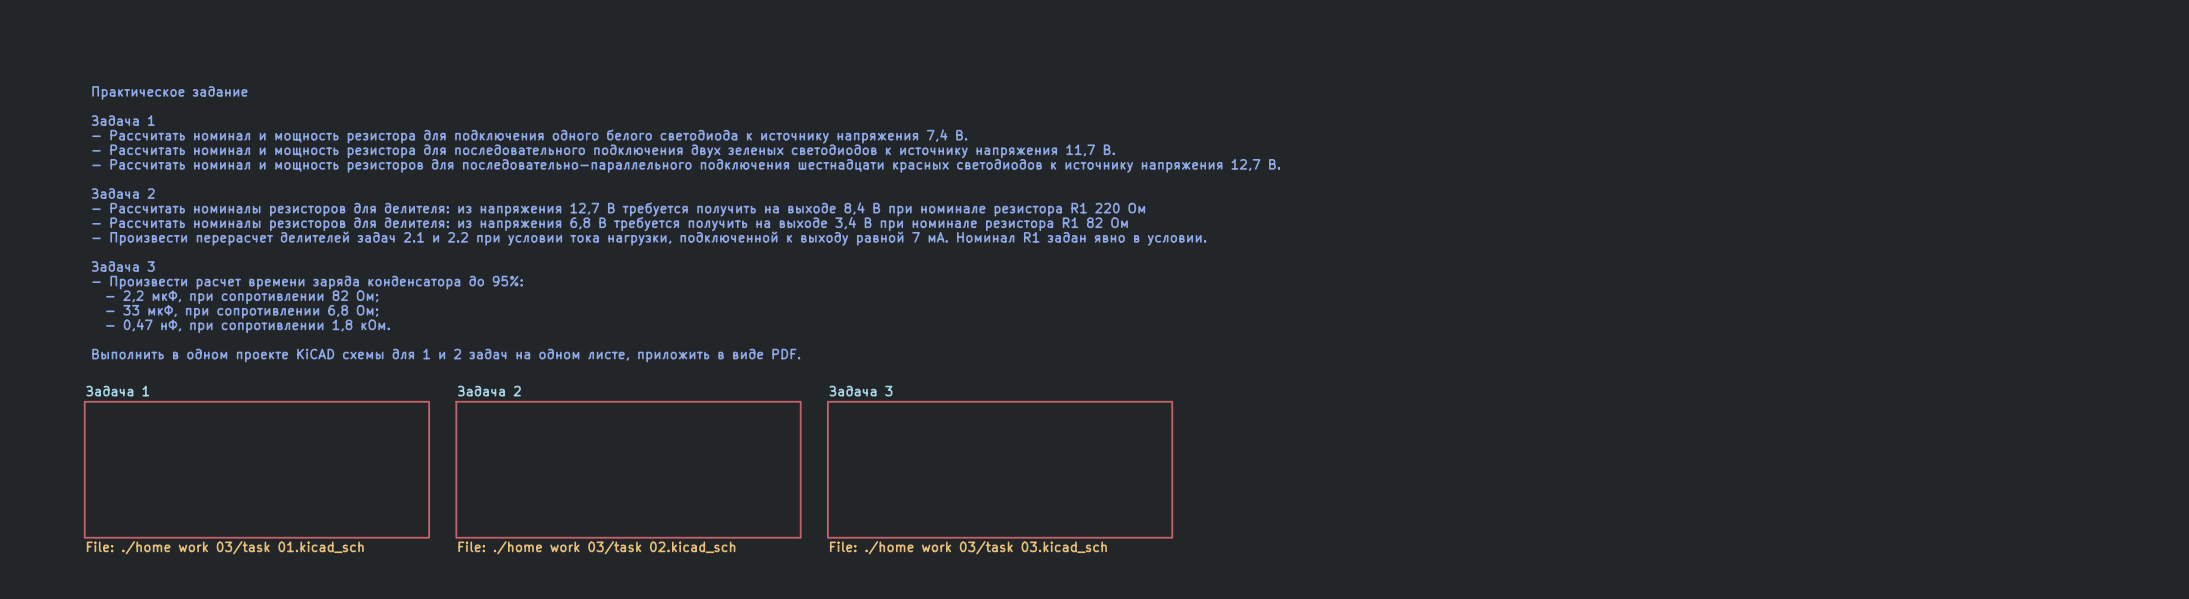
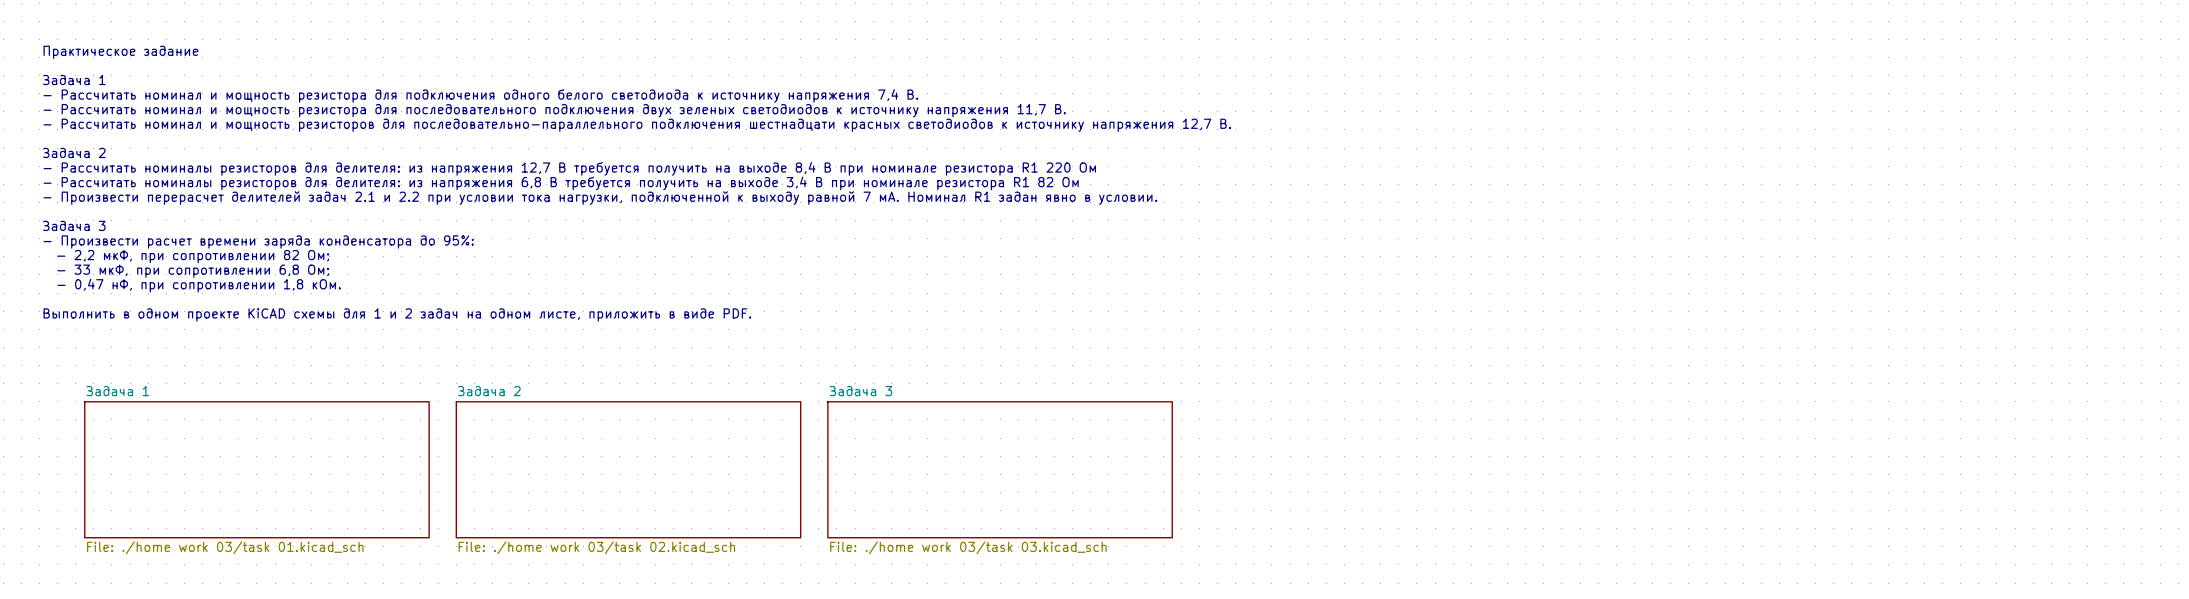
text position: Практическое задание (169, 92) -> Практическое задание (120, 52)
text position: Задача 1 (123, 120) -> Задача 1 (74, 79)
text position: - Рассчитать номинал и мощность резистора для подключения одного белого светодиода к источнику напряжения 7,4 В. (529, 136) -> - Рассчитать номинал и мощность резистора для подключения одного белого светодиода к источнику напряжения 7,4 В. (480, 95)
text position: - Рассчитать номинал и мощность резистора для последовательного подключения двух зеленых светодиодов к источнику напряжения 11,7 В. (603, 151) -> - Рассчитать номинал и мощность резистора для последовательного подключения двух зеленых светодиодов к источнику напряжения 11,7 В. (554, 110)
text position: - Рассчитать номинал и мощность резисторов для последовательно-параллельного подключения шестнадцати красных светодиодов к источнику напряжения 12,7 В. (686, 165) -> - Рассчитать номинал и мощность резисторов для последовательно-параллельного подключения шестнадцати красных светодиодов к источнику напряжения 12,7 В. (637, 125)
text position: Задача 2 (123, 193) -> Задача 2 (74, 152)
text position: - Рассчитать номиналы резисторов для делителя: из напряжения 12,7 В требуется получить на выходе 8,4 В при номинале резистора R1 220 Ом (618, 209) -> - Рассчитать номиналы резисторов для делителя: из напряжения 12,7 В требуется получить на выходе 8,4 В при номинале резистора R1 220 Ом (569, 168)
text position: - Рассчитать номиналы резисторов для делителя: из напряжения 6,8 В требуется получить на выходе 3,4 В при номинале резистора R1 82 Ом (610, 224) -> - Рассчитать номиналы резисторов для делителя: из напряжения 6,8 В требуется получить на выходе 3,4 В при номинале резистора R1 82 Ом (561, 183)
text position: - Произвести перерасчет делителей задач 2.1 и 2.2 при условии тока нагрузки, подключенной к выходу равной 7 мА. Номинал R1 задан явно в условии. (649, 238) -> - Произвести перерасчет делителей задач 2.1 и 2.2 при условии тока нагрузки, подключенной к выходу равной 7 мА. Номинал R1 задан явно в условии. (600, 198)
text position: Задача 3 (123, 266) -> Задача 3 (74, 225)
text position: - Произвести расчет времени заряда конденсатора до 95%: (307, 282) -> - Произвести расчет времени заряда конденсатора до 95%: (258, 241)
text position: - 2,2 мкФ, при сопротивлении 82 Ом; (242, 297) -> - 2,2 мкФ, при сопротивлении 82 Ом; (193, 256)
text position: - 33 мкФ, при сопротивлении 6,8 Ом; (242, 311) -> - 33 мкФ, при сопротивлении 6,8 Ом; (193, 271)
text position: - 0,47 нФ, при сопротивлении 1,8 кОм. (247, 326) -> - 0,47 нФ, при сопротивлении 1,8 кОм. (199, 285)
text position: Выполнить в одном проекте KiCAD схемы для 1 и 2 задач на одном листе, приложить в виде PDF. (446, 355) -> Выполнить в одном проекте KiCAD схемы для 1 и 2 задач на одном листе, приложить в виде PDF. (397, 314)

